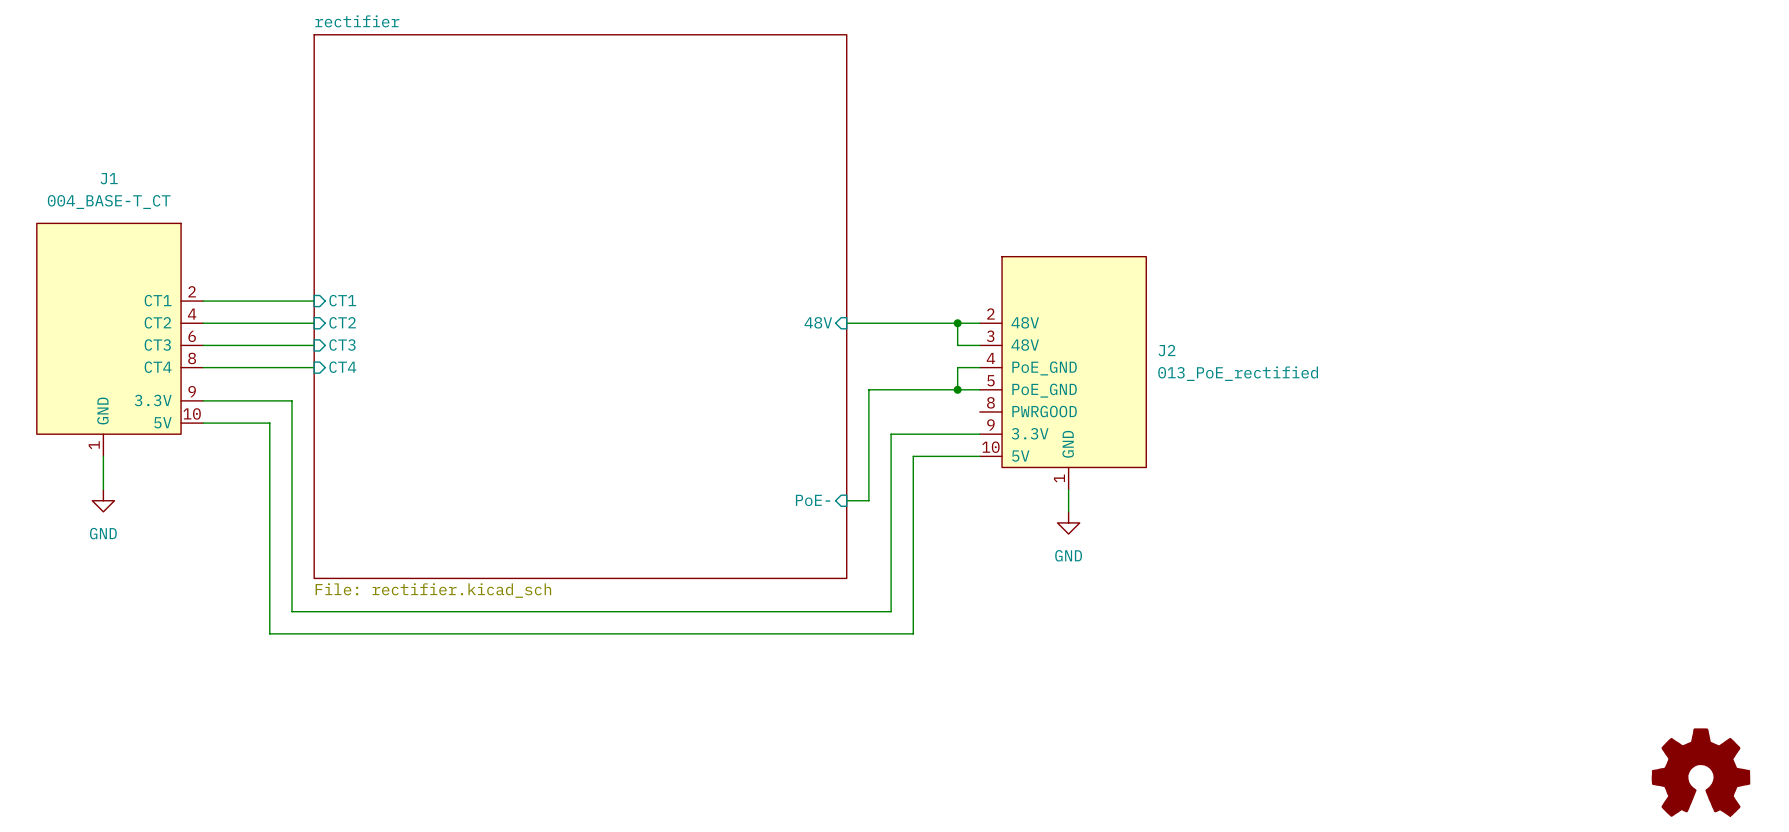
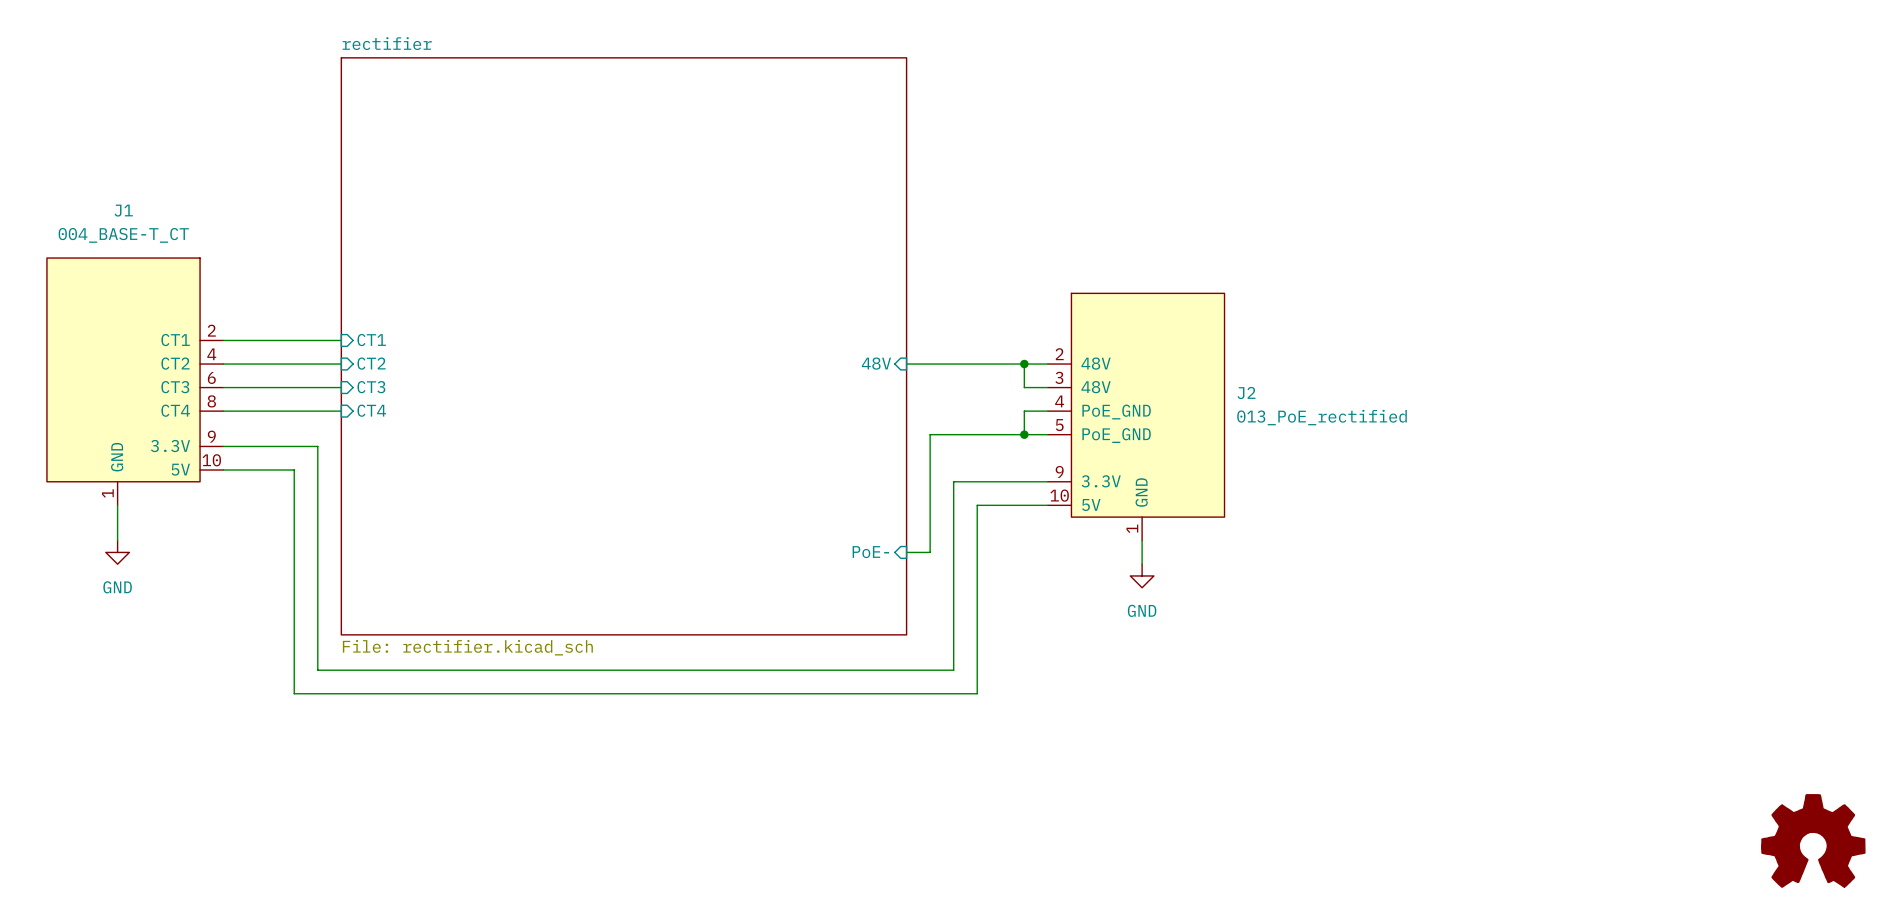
J2 symbol: [979, 256, 1147, 490] -> [1047, 293, 1225, 541]

